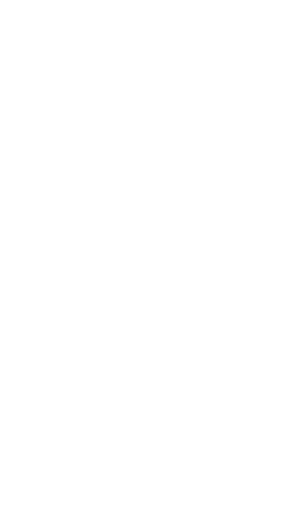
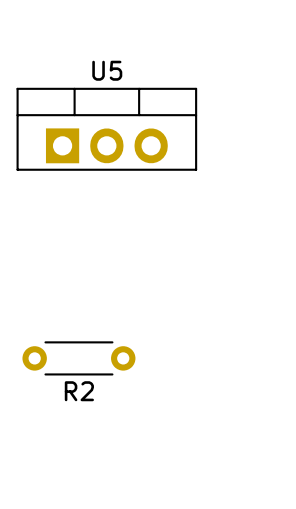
U5: none -> (106, 129)
R2: none -> (78, 358)

